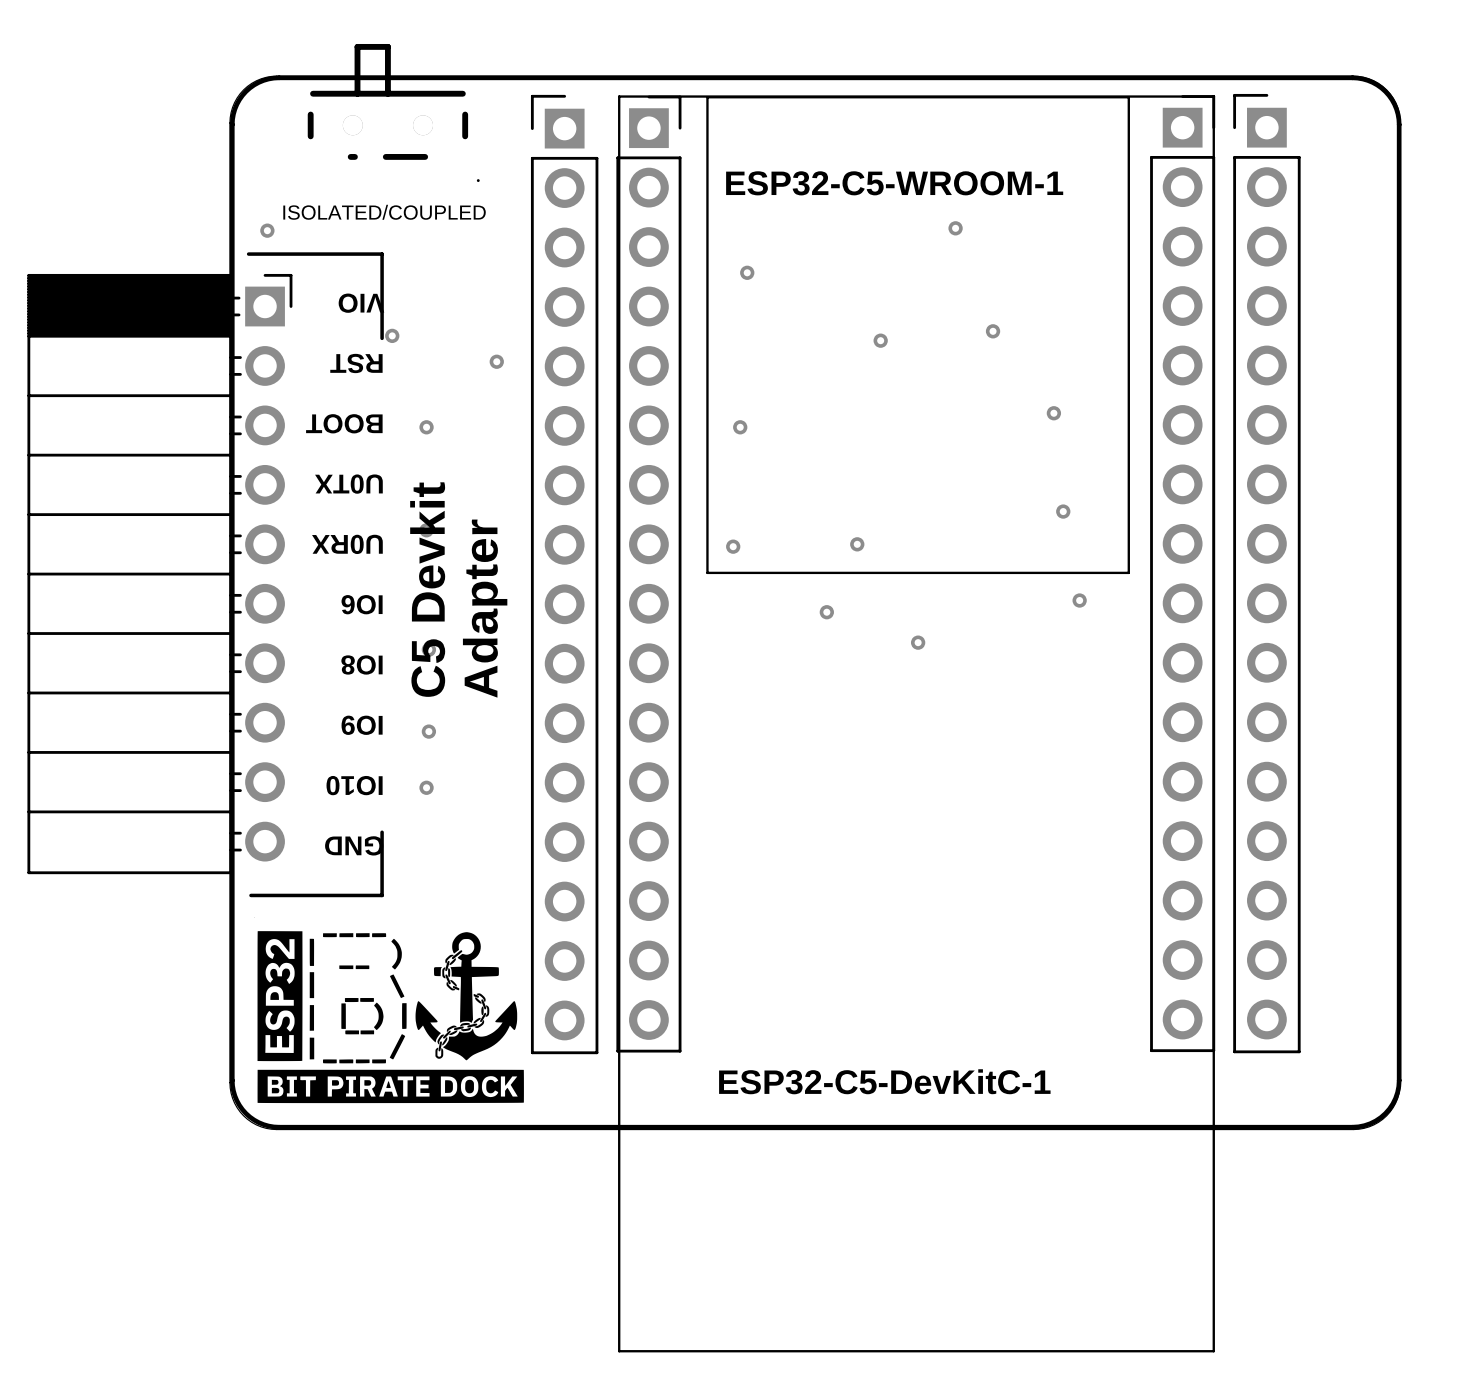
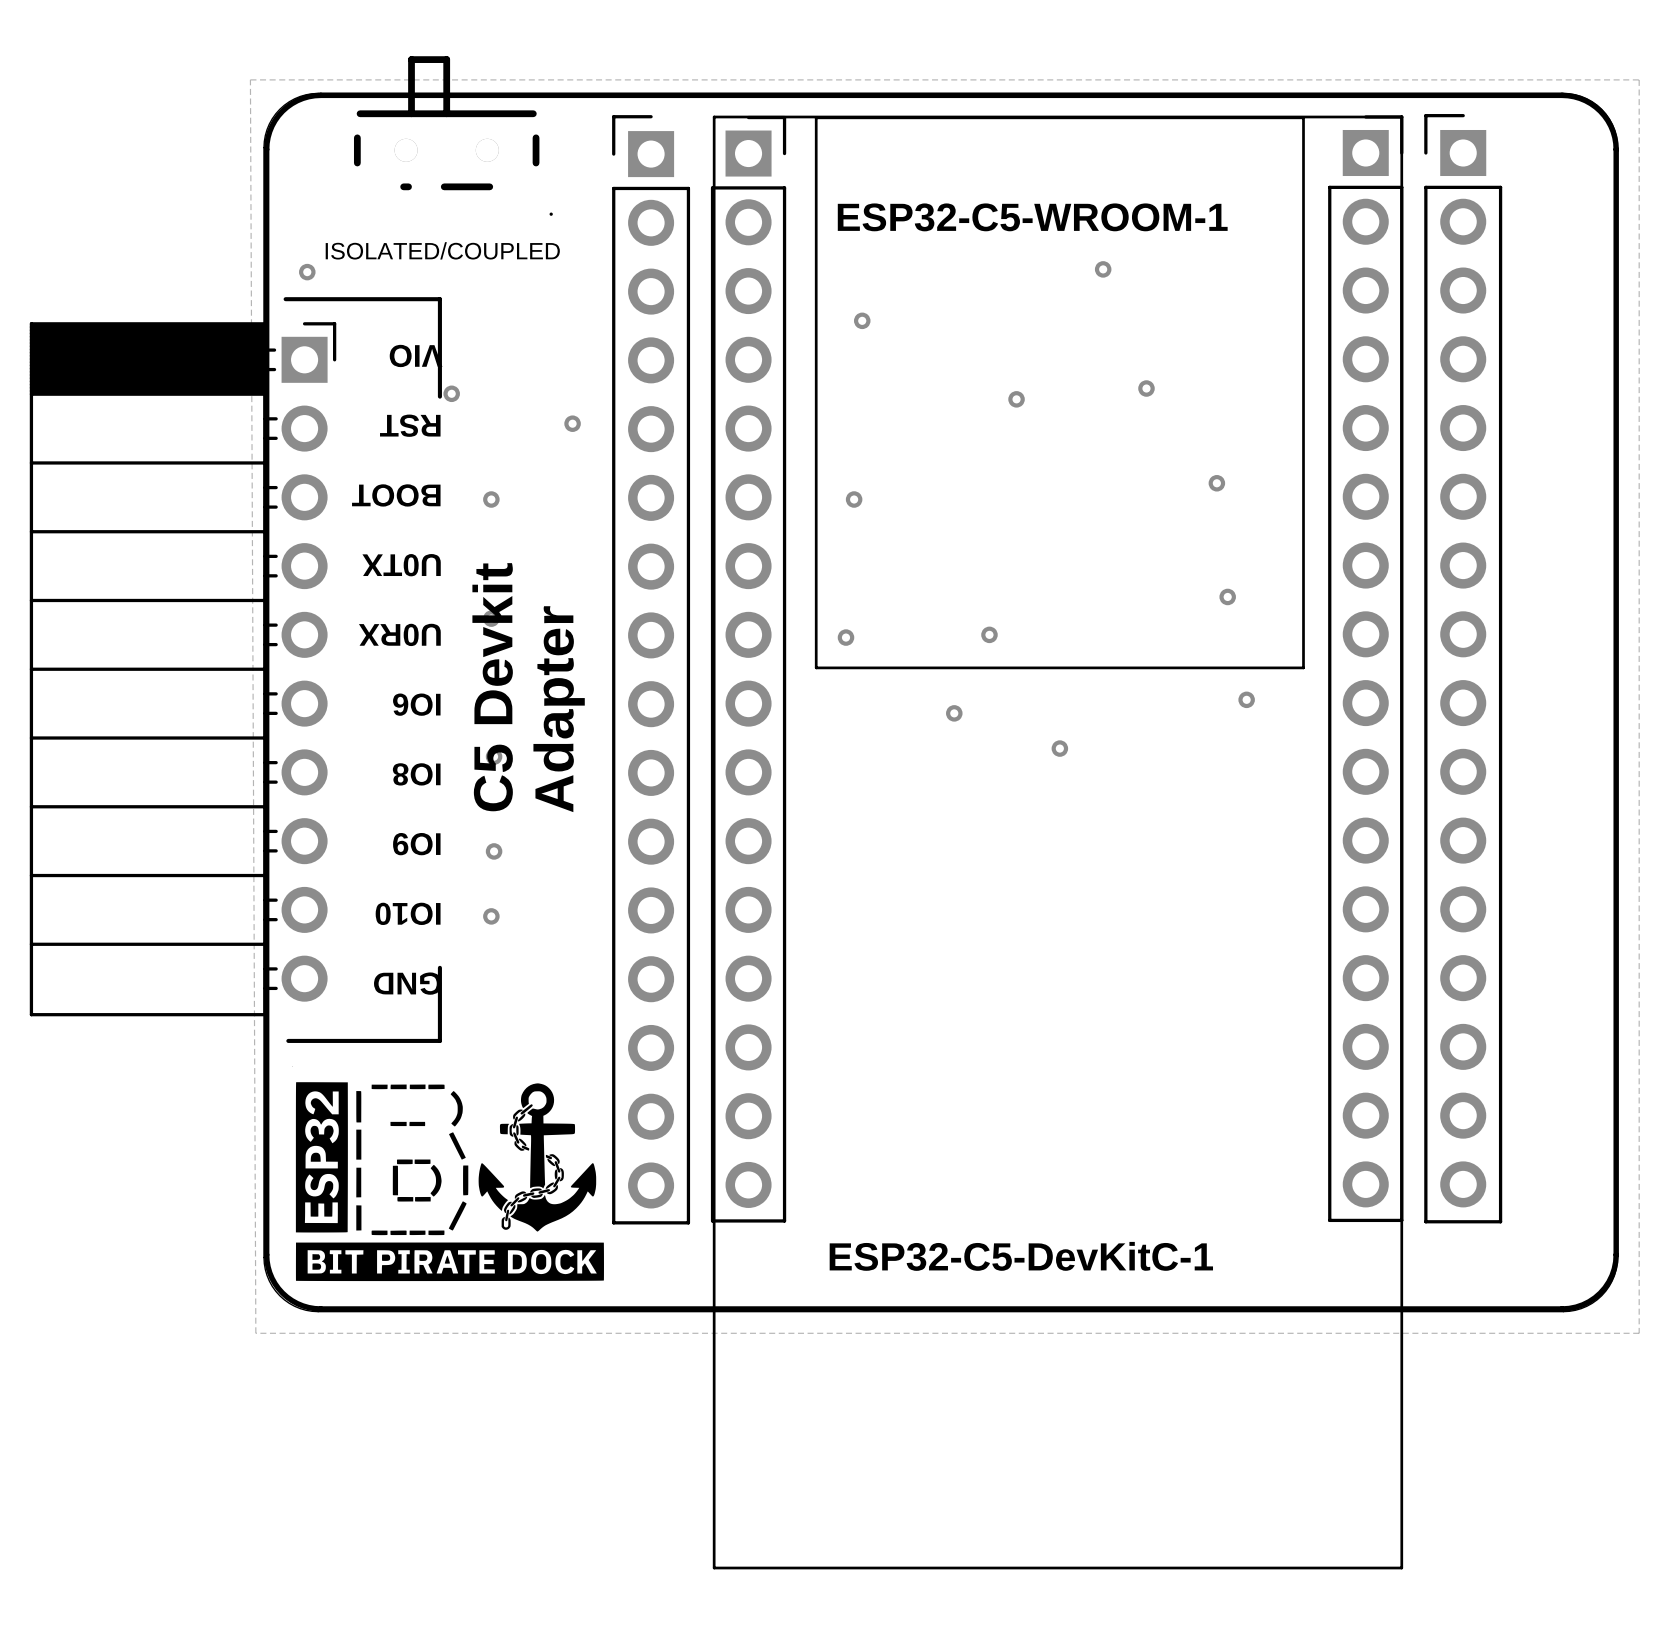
zone outline: none -> (250, 79) (1639, 79) (1639, 1333) (255, 1333) (250, 79)

